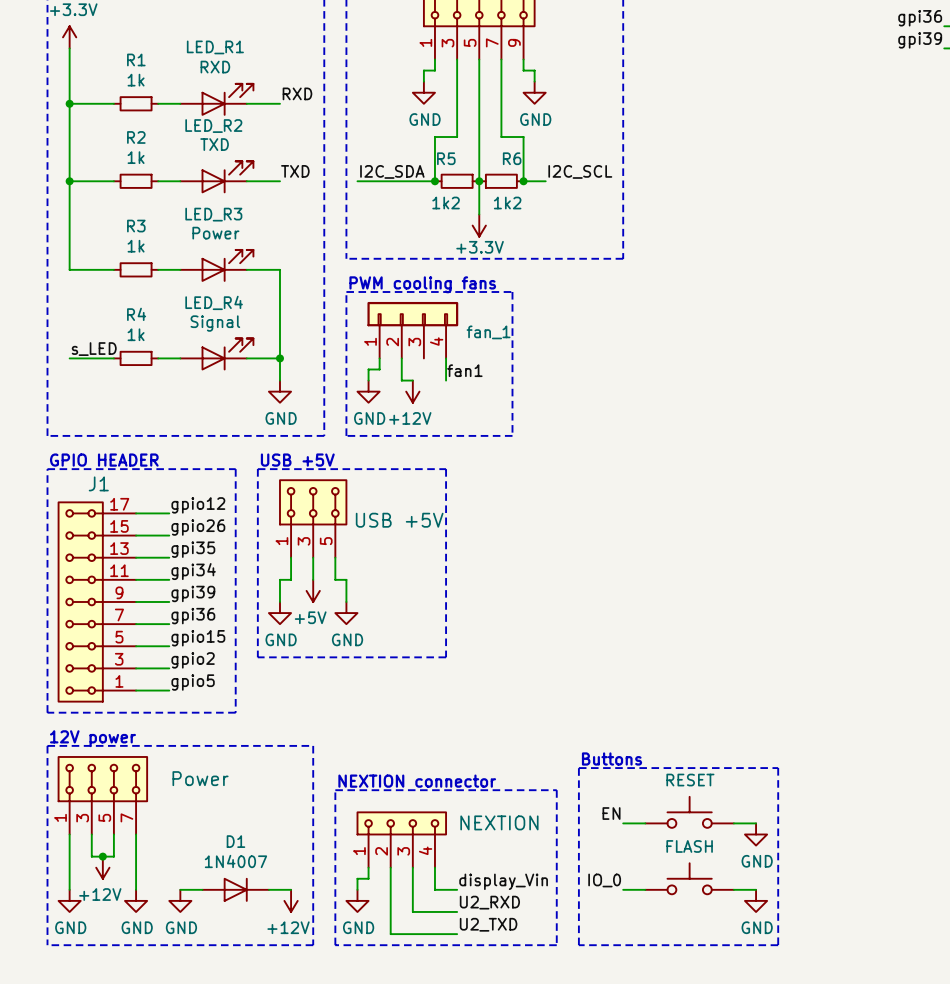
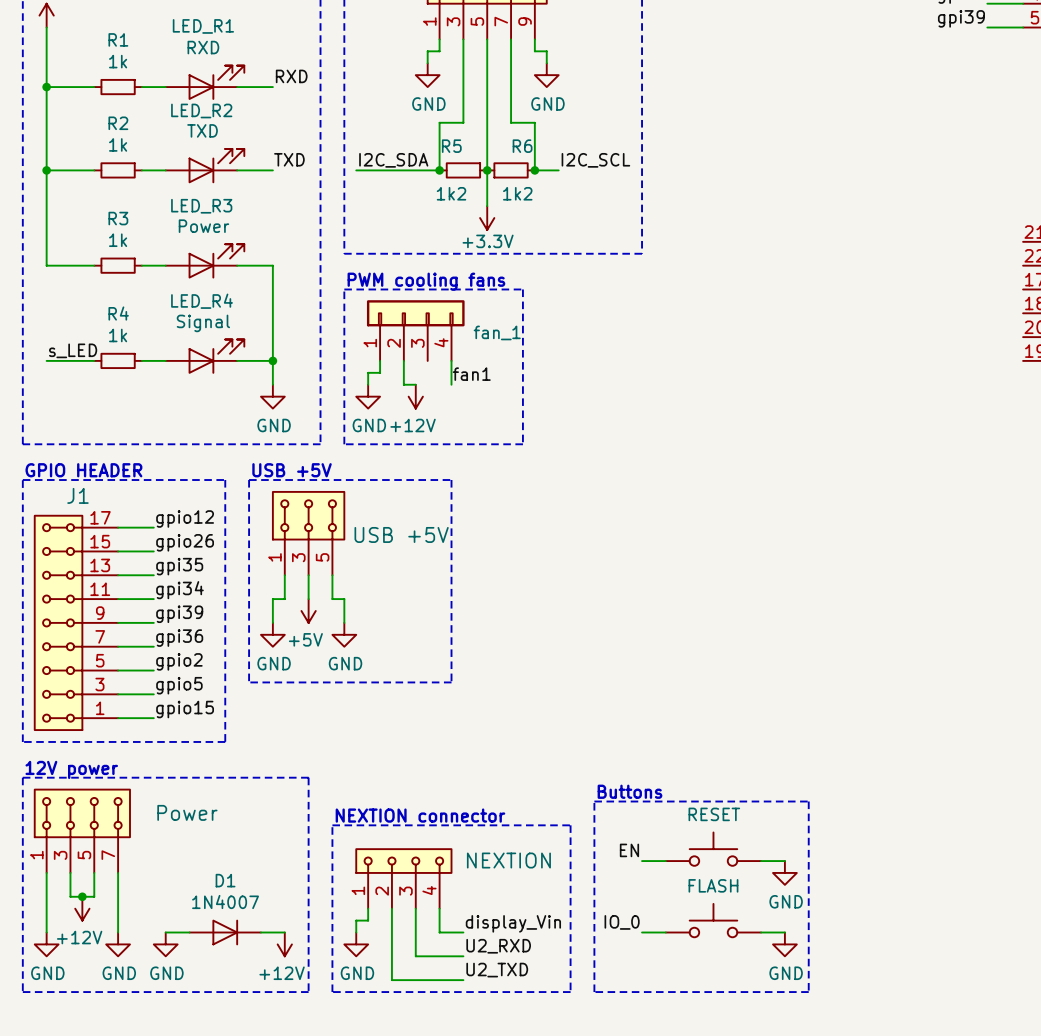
label: gpio15 (198, 638) -> gpio2 (179, 661)
label: gpio2 (193, 660) -> gpio5 (179, 685)
label: gpio5 (193, 682) -> gpio15 (185, 709)

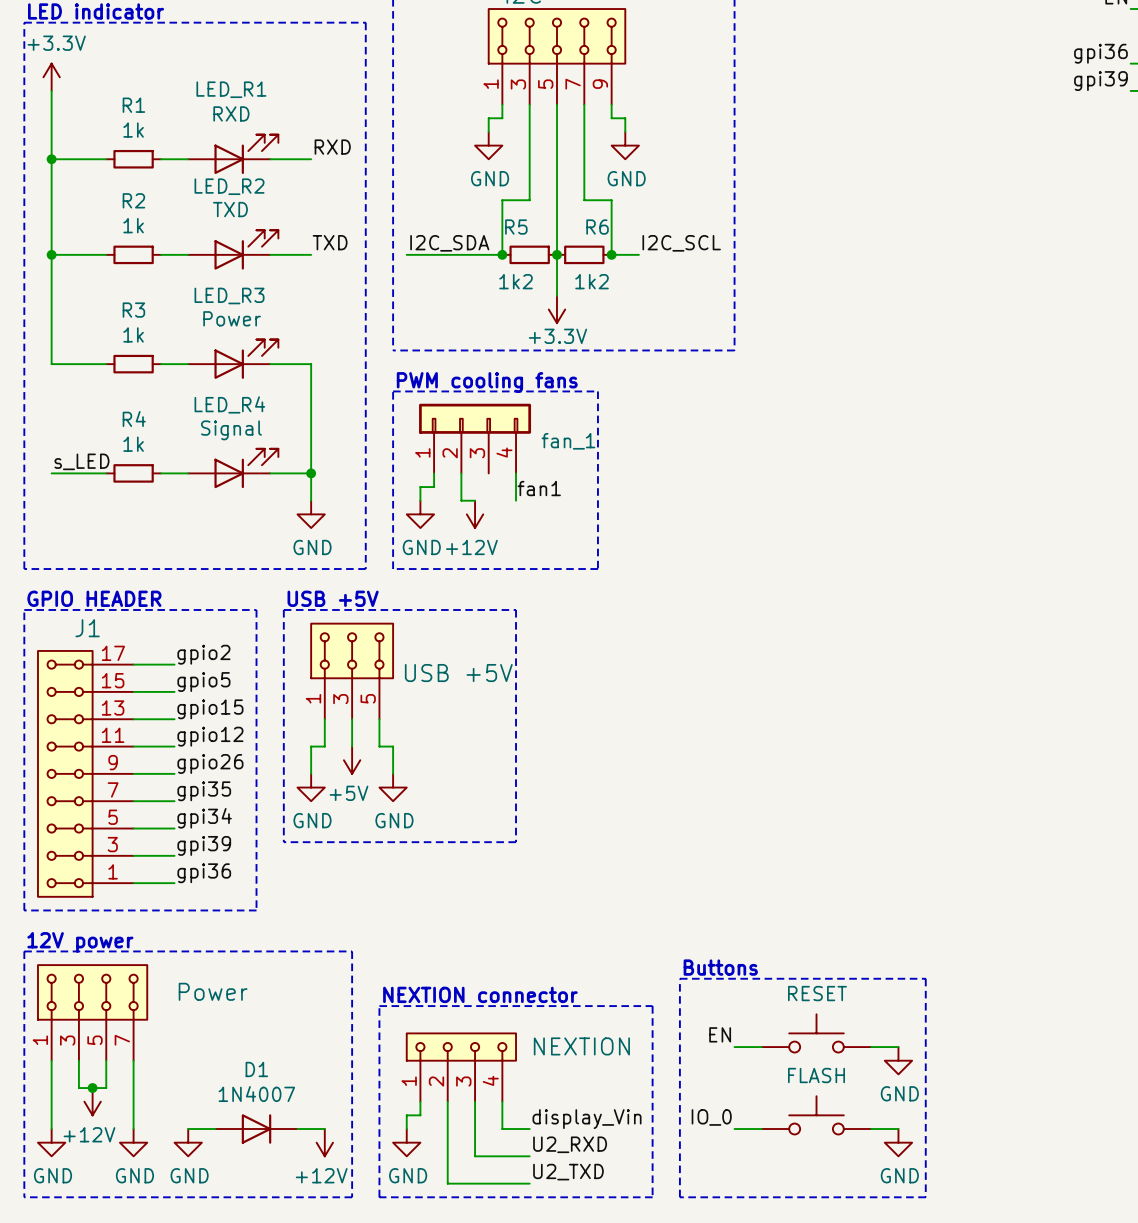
label: gpio12 (185, 518) -> gpio2 (203, 654)
label: gpio26 (185, 542) -> gpio5 (203, 682)
label: gpi35 (179, 566) -> gpio15 (210, 709)
label: gpi34 (179, 590) -> gpio12 (210, 736)
label: gpi39 (179, 614) -> gpio26 (210, 763)
label: gpi36 (179, 638) -> gpi35 (204, 791)
label: gpio2 (179, 661) -> gpi34 (204, 818)
label: gpio5 (179, 685) -> gpi39 (204, 845)
label: gpio15 (185, 709) -> gpi36 (204, 873)

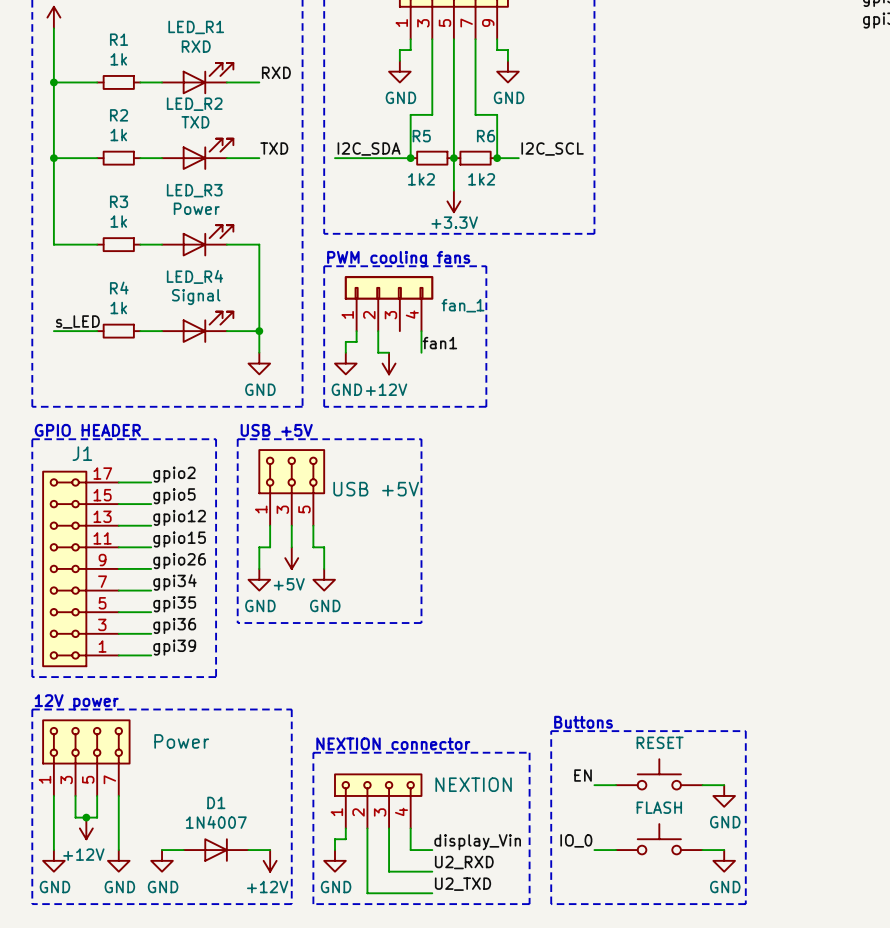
label: gpio15 (210, 709) -> gpio12 (179, 517)
label: gpio12 (210, 736) -> gpio15 (179, 539)
label: gpi35 (204, 791) -> gpi34 (174, 582)
label: gpi34 (204, 818) -> gpi35 (174, 604)
label: gpi39 (204, 845) -> gpi36 (174, 625)
label: gpi36 (204, 873) -> gpi39 (174, 647)

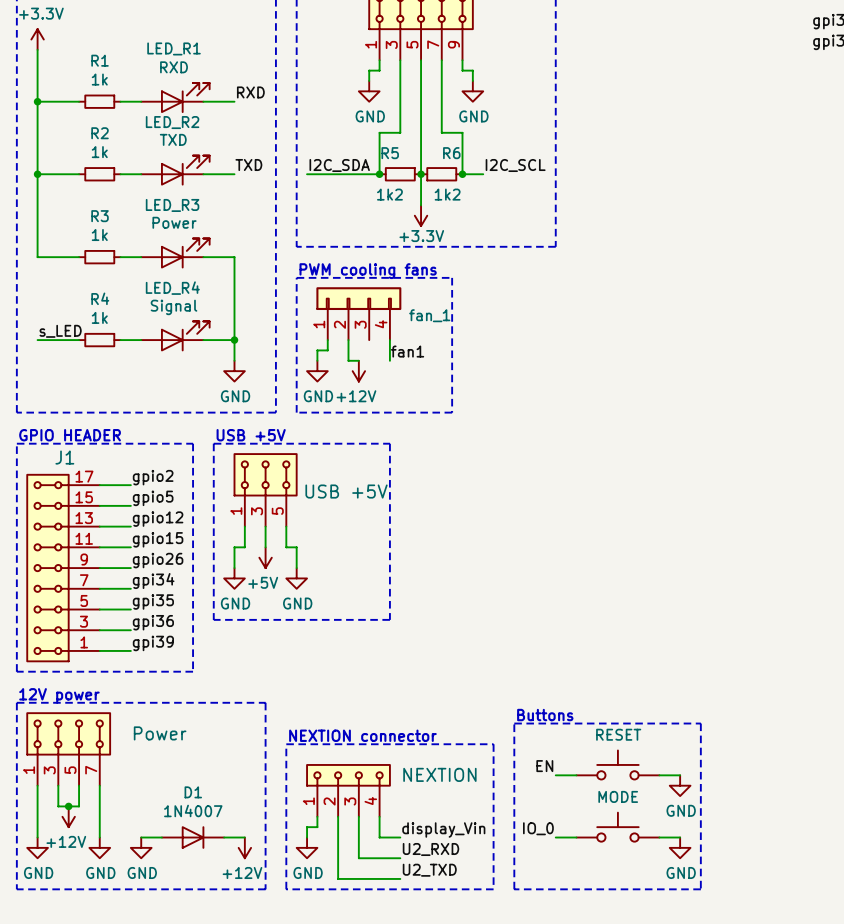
part value: FLASH (659, 807) -> MODE (618, 796)

